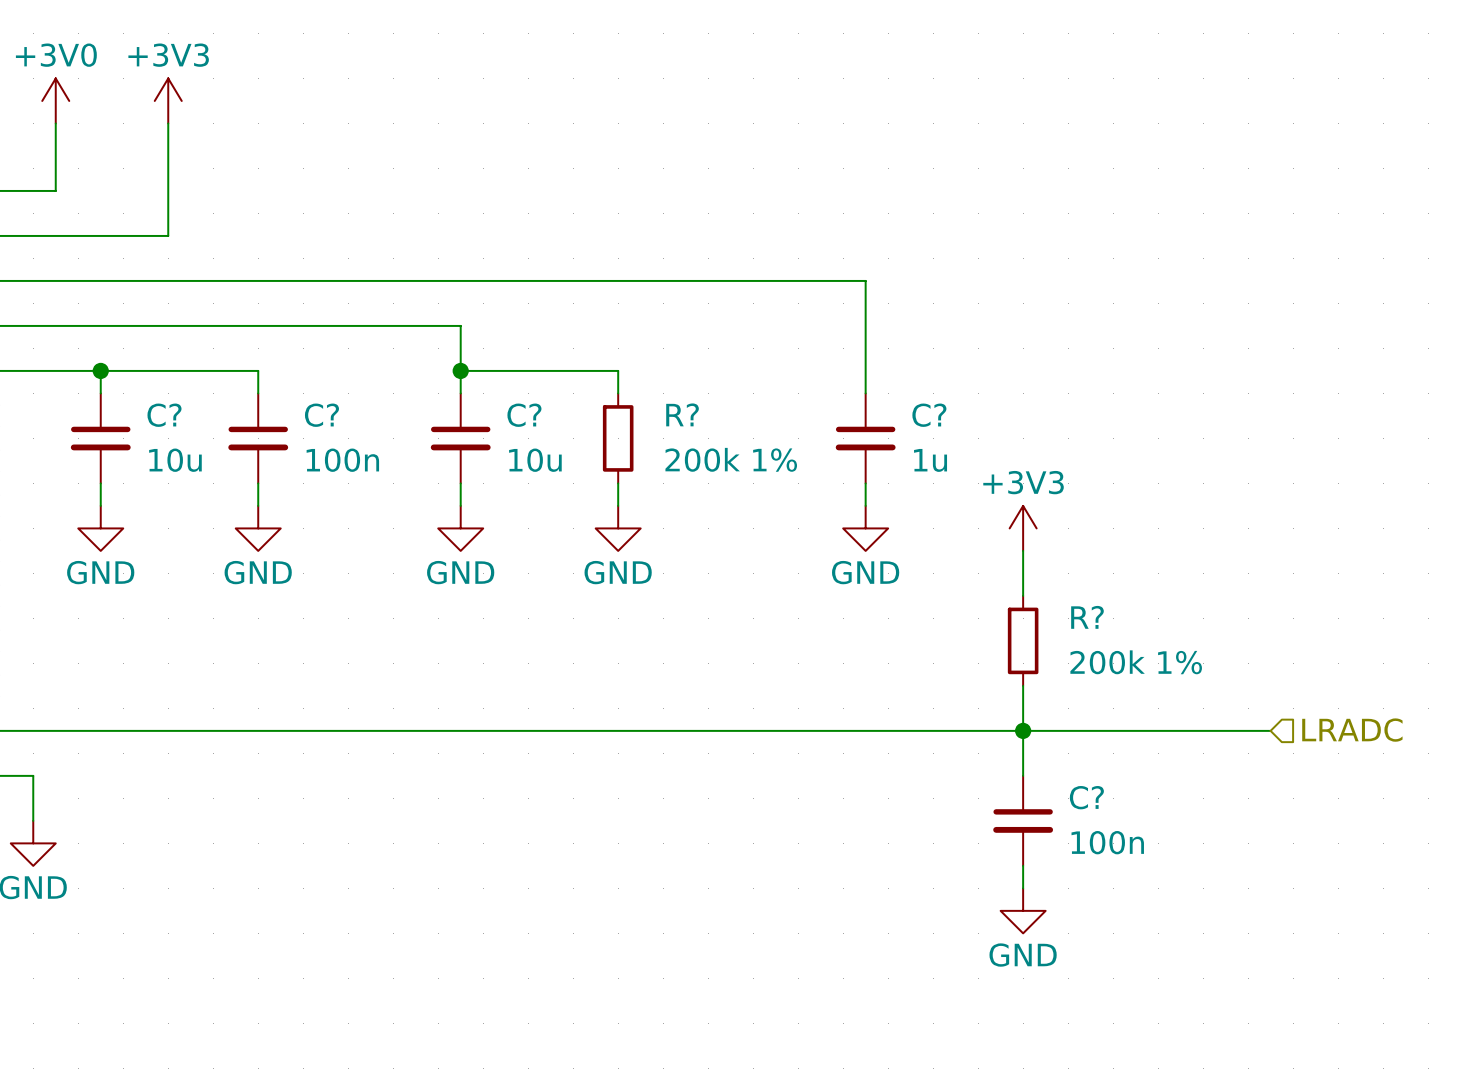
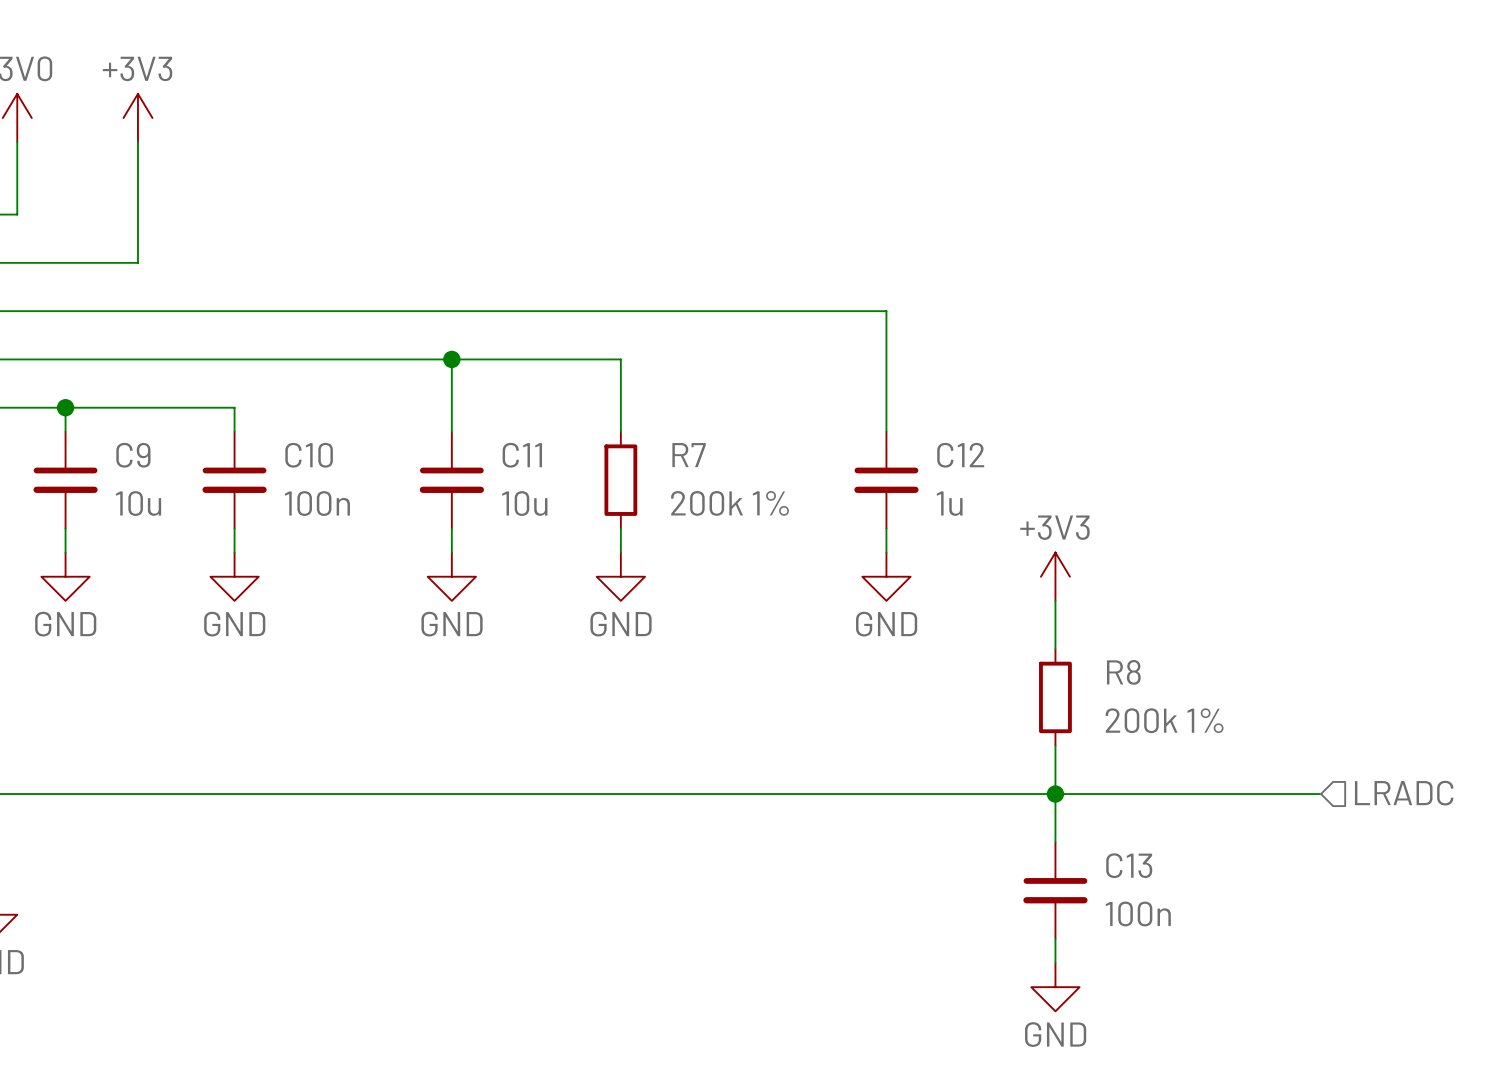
wire: (460, 370) (618, 370) -> (451, 359) (620, 359) (620, 407)
junction position: (460, 370) -> (451, 359)
R? name: R? (682, 414) -> R7 (689, 455)
C? name: C? (164, 415) -> C9 (133, 455)
C? name: C? (321, 415) -> C10 (309, 455)
C? name: C? (524, 415) -> C11 (522, 455)
C? name: C? (929, 415) -> C12 (960, 455)
R? name: R? (1087, 617) -> R8 (1123, 672)
C? name: C? (1086, 797) -> C13 (1129, 865)

